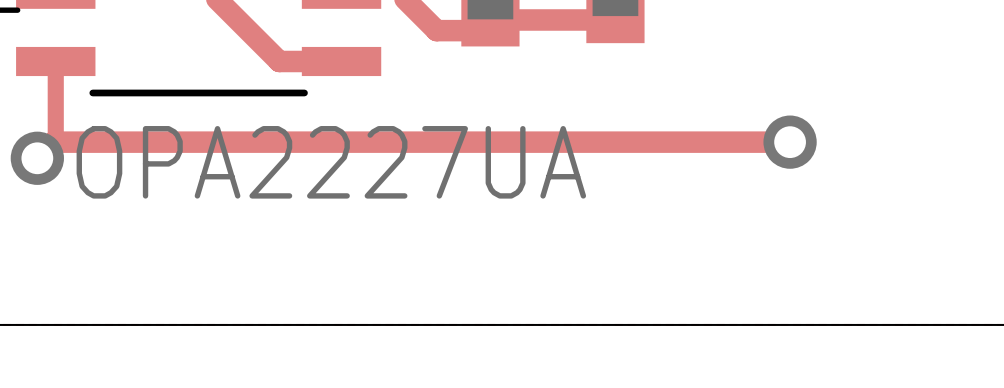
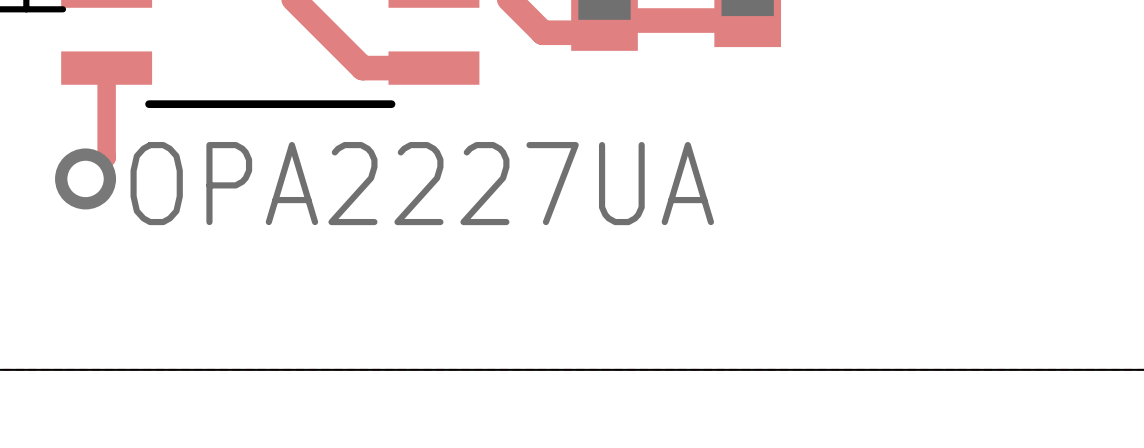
track: (790, 142) (53, 142) (37, 158) -> none
via: (790, 142) -> none

